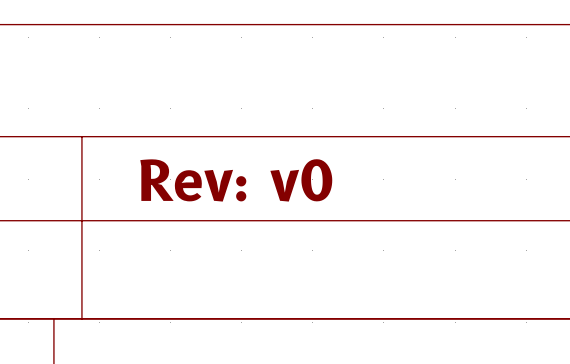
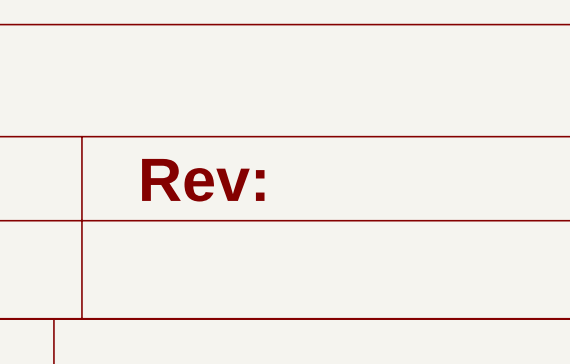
title block: Rev: v0 (236, 180) -> Rev: (203, 180)

